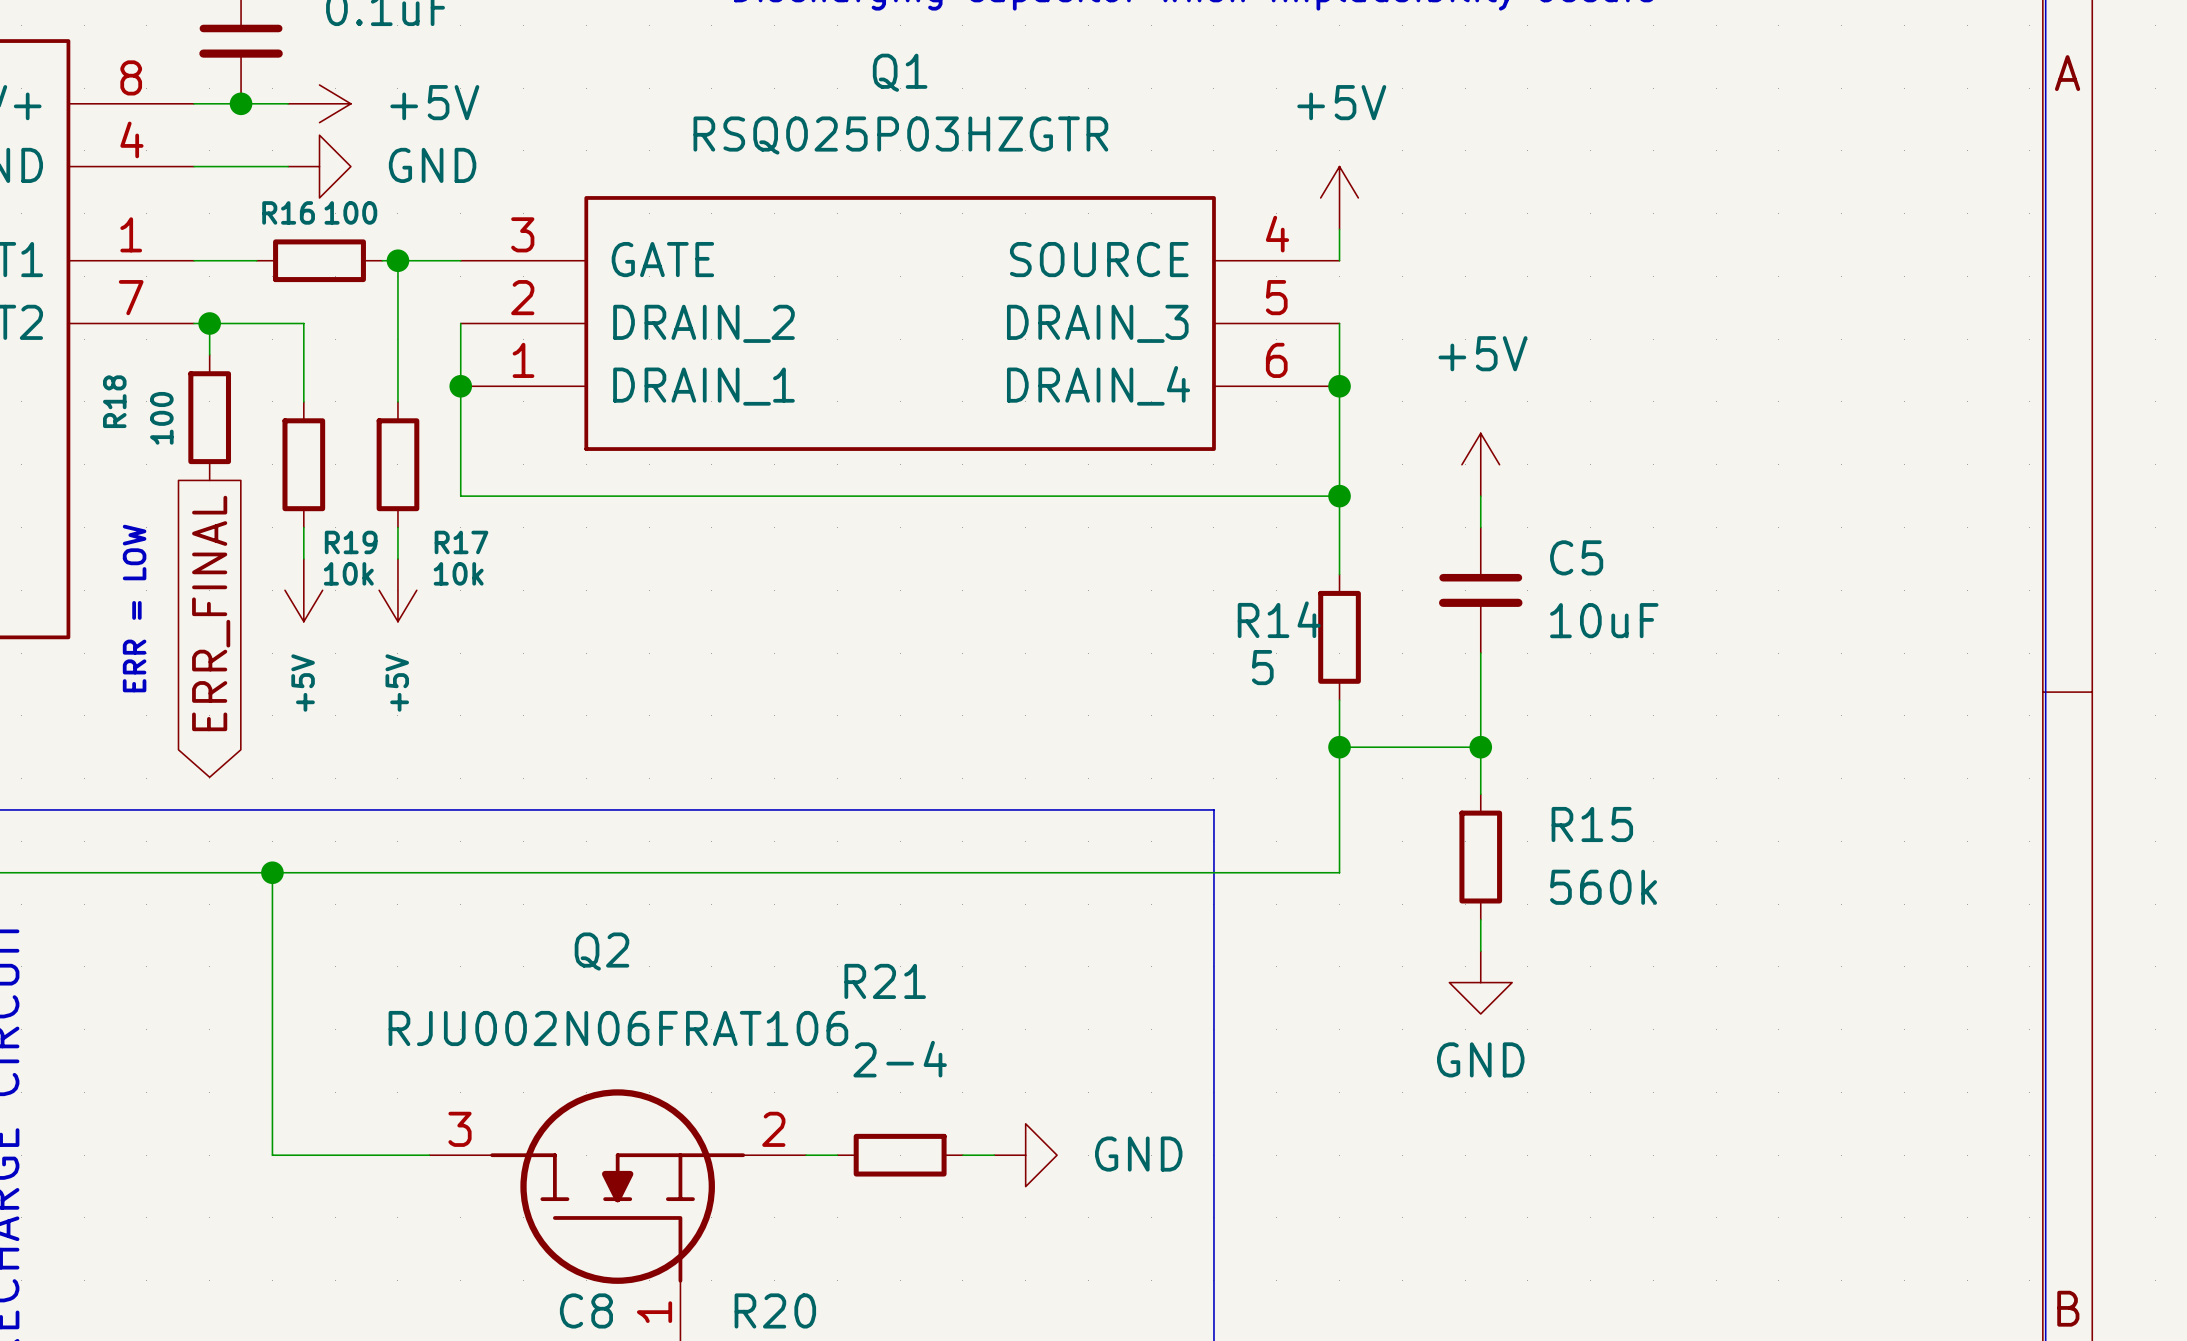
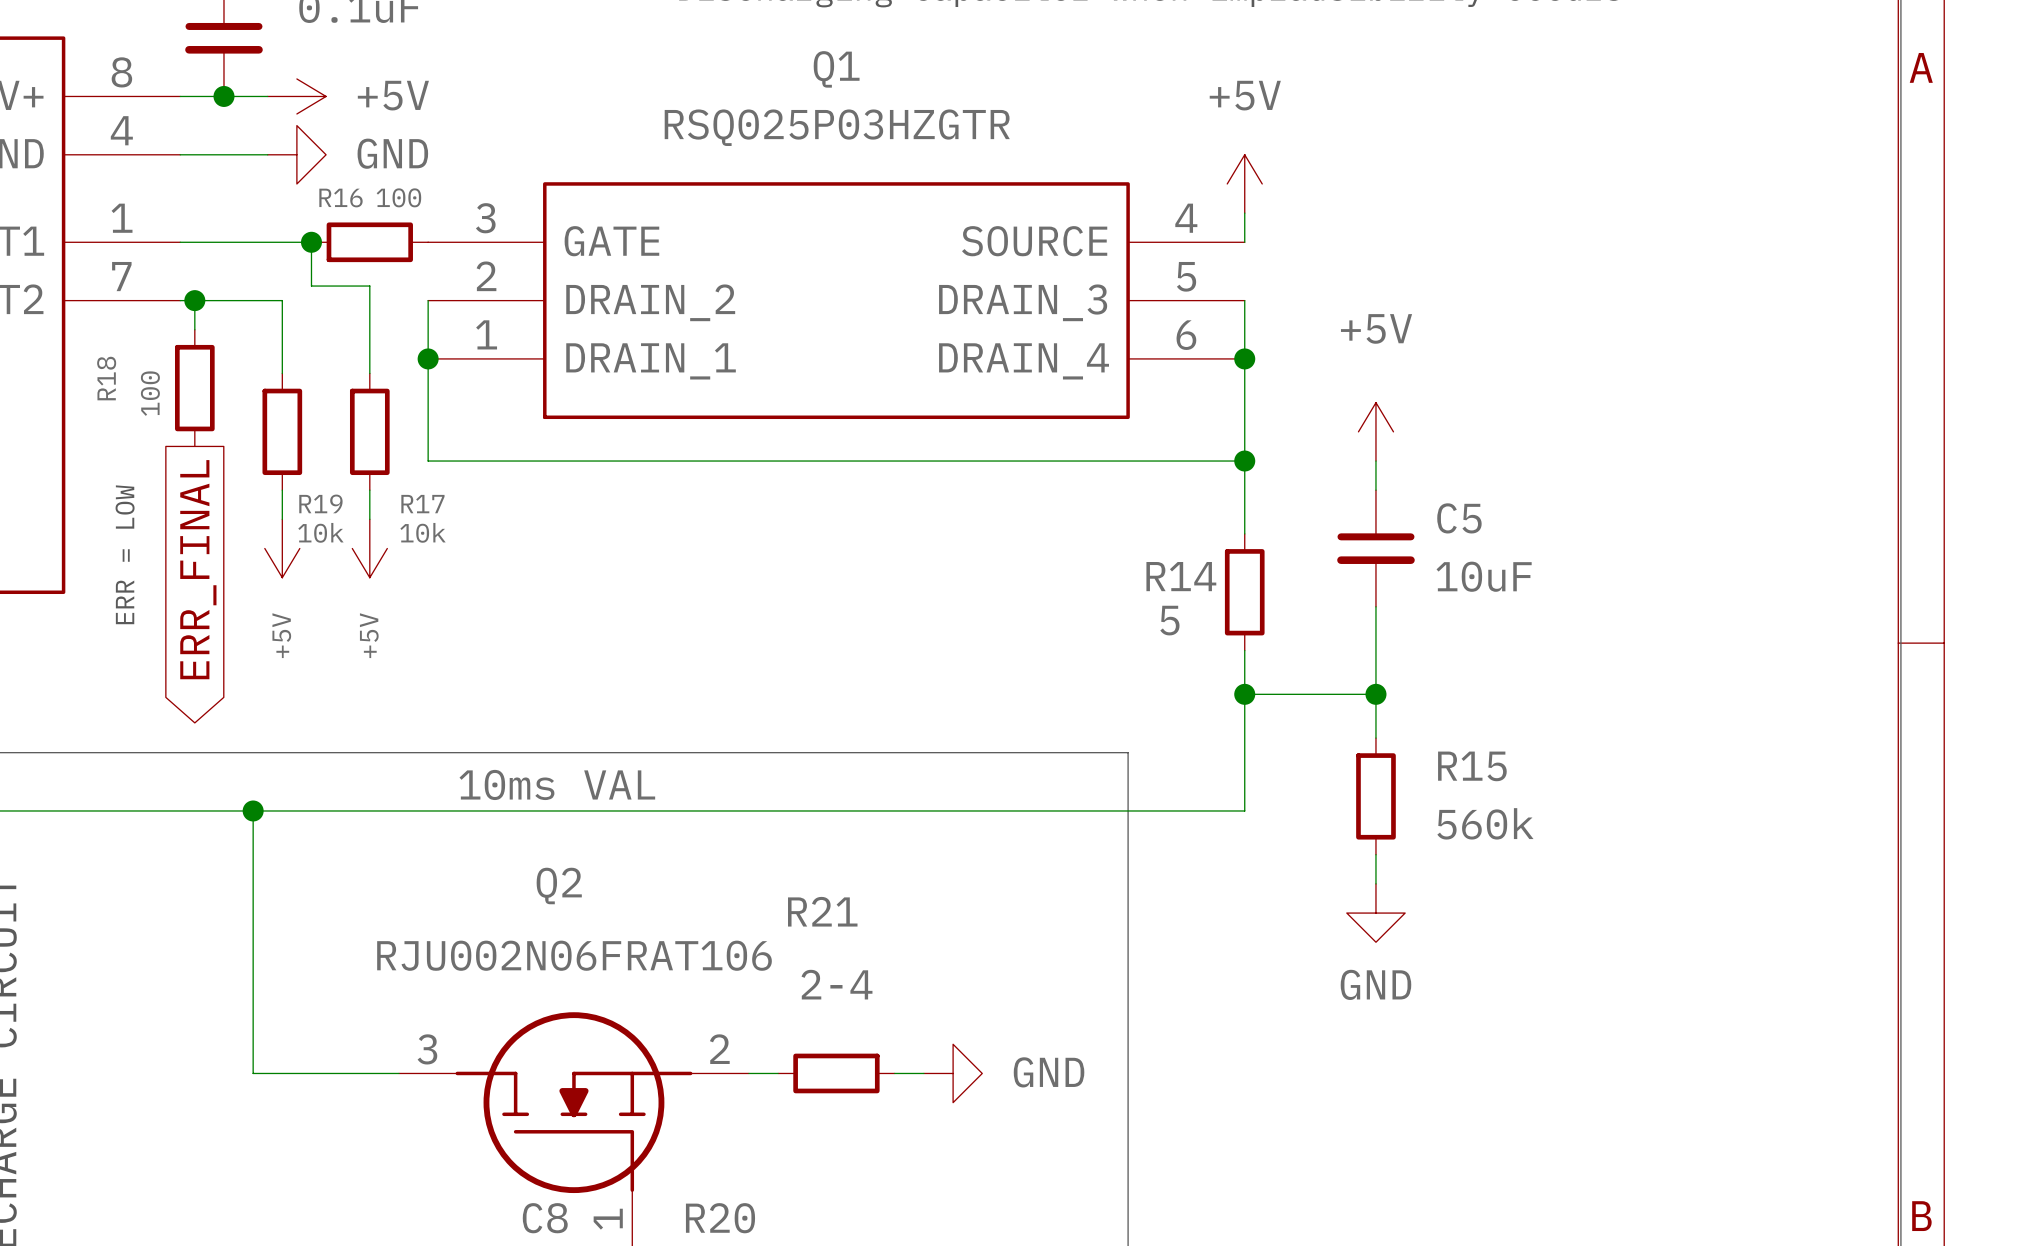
R16 position: (319, 260) -> (369, 242)
wire: (382, 260) (460, 260) -> none
wire: (397, 260) (397, 307) -> (238, 242) (311, 242) (311, 286) (369, 286)
junction position: (397, 260) -> (311, 242)
label: none -> 10ms VAL (557, 784)

